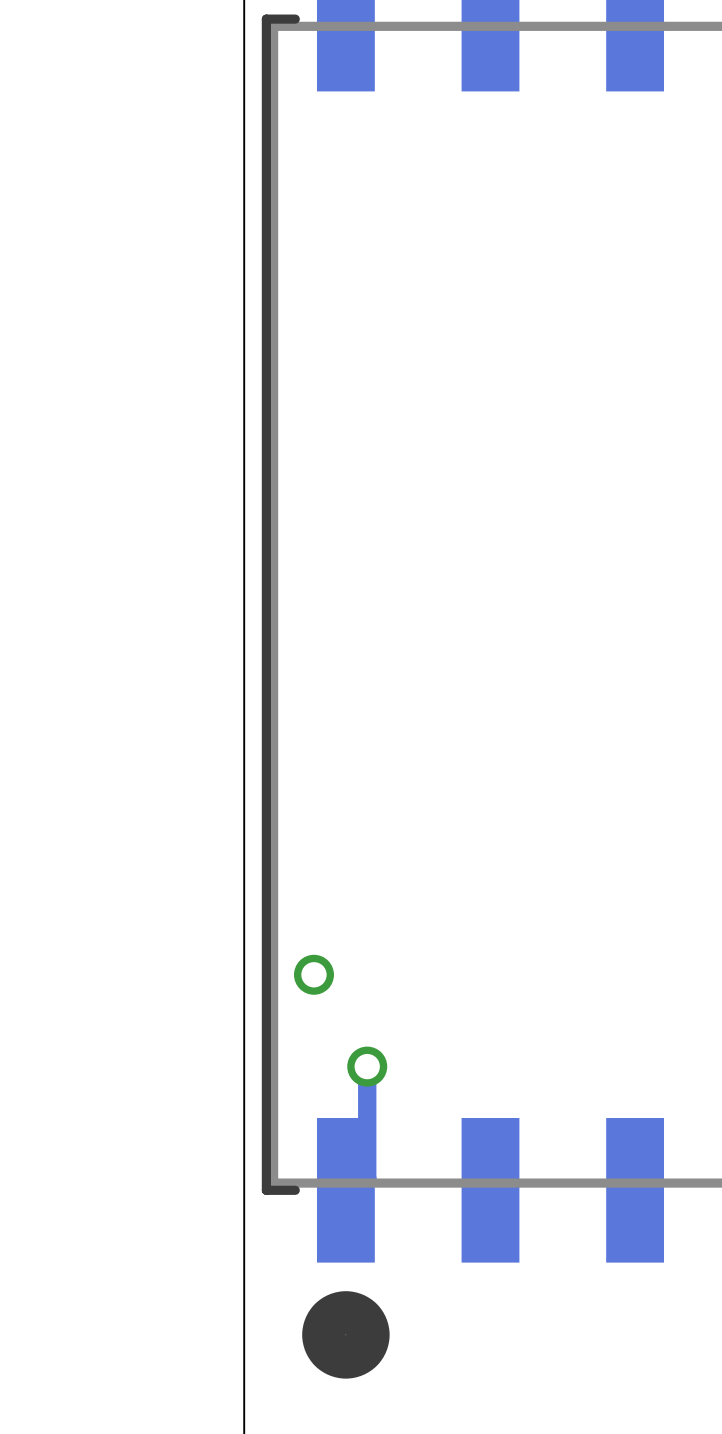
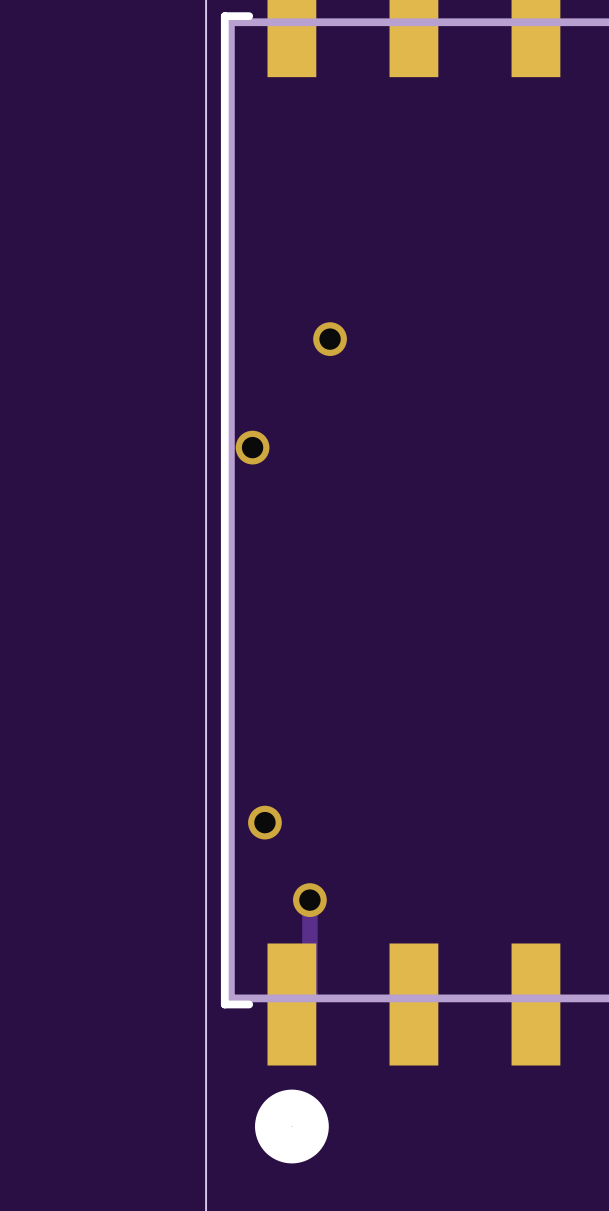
via: none -> (330, 339)
via: none -> (252, 447)

